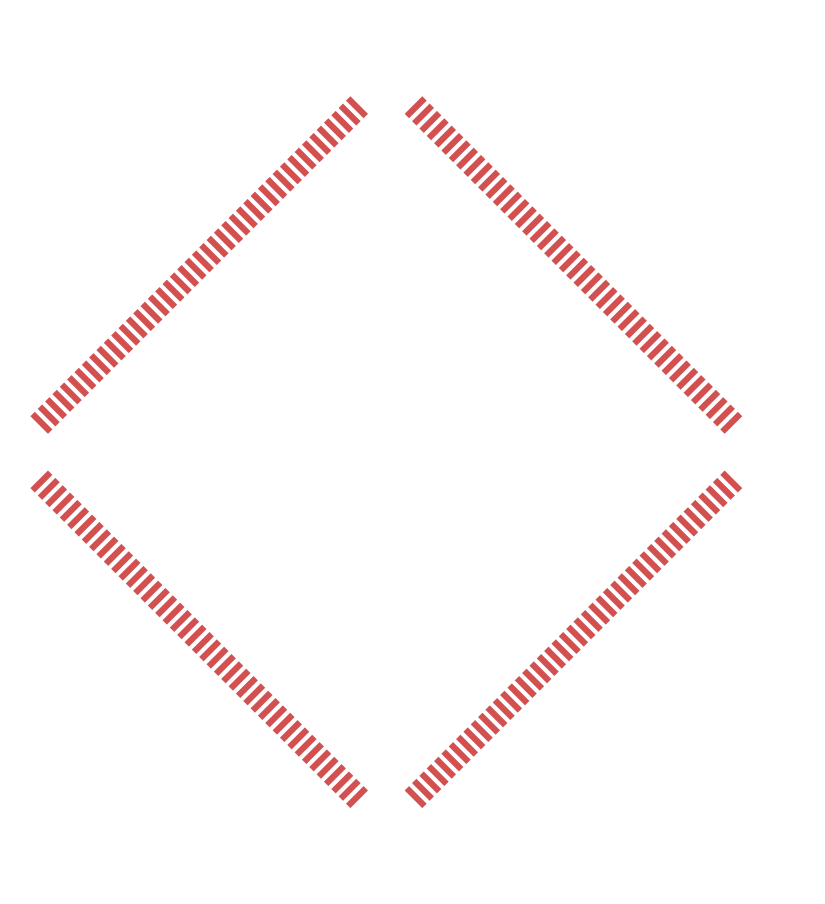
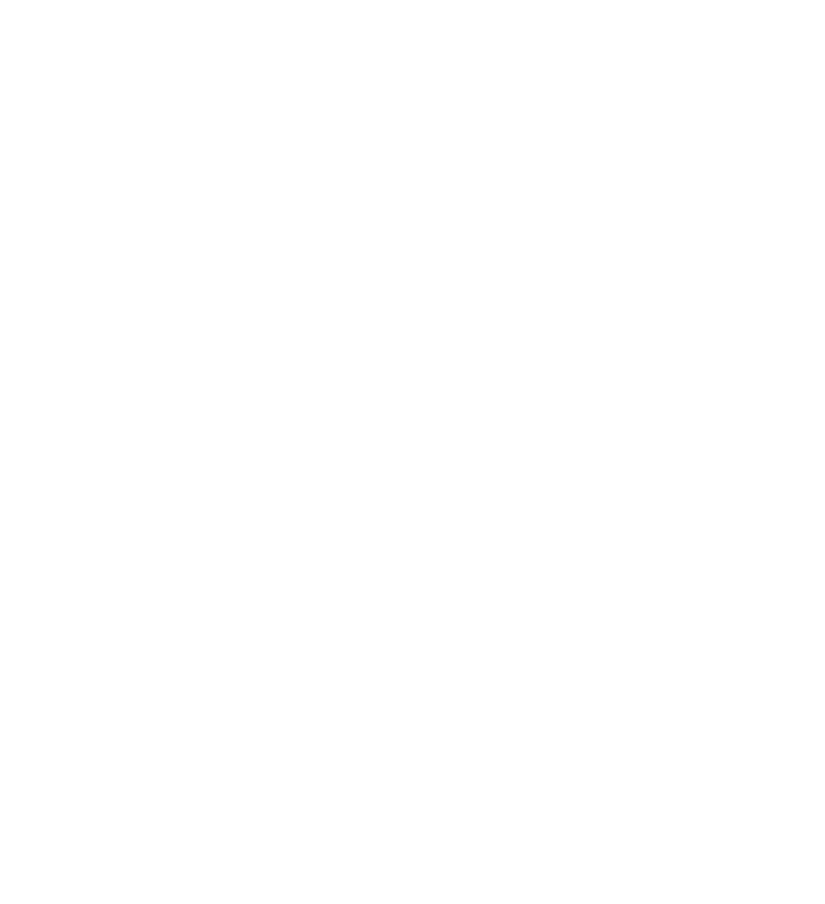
part: (386, 452) -> none

